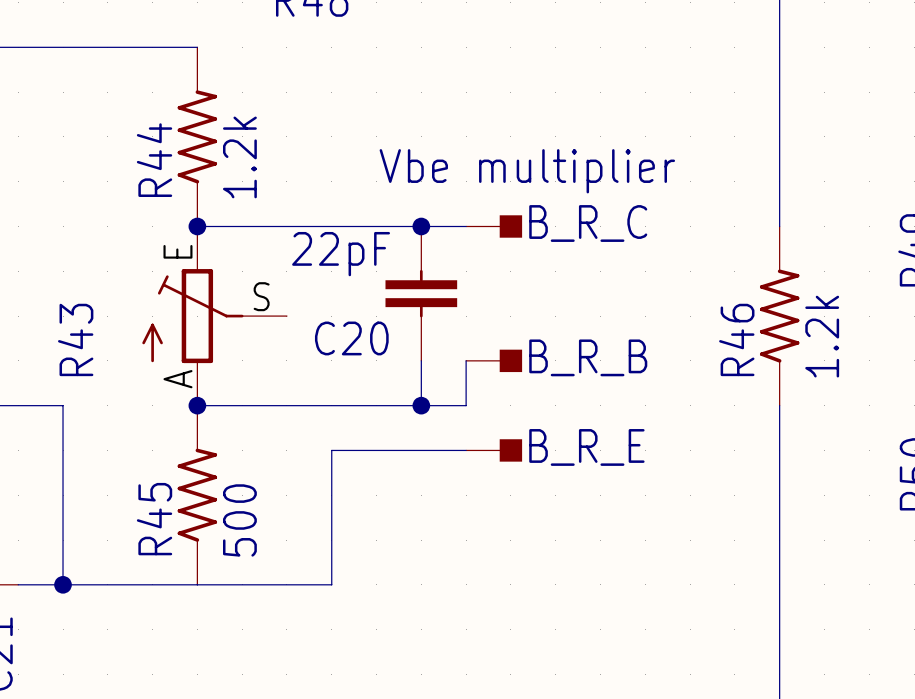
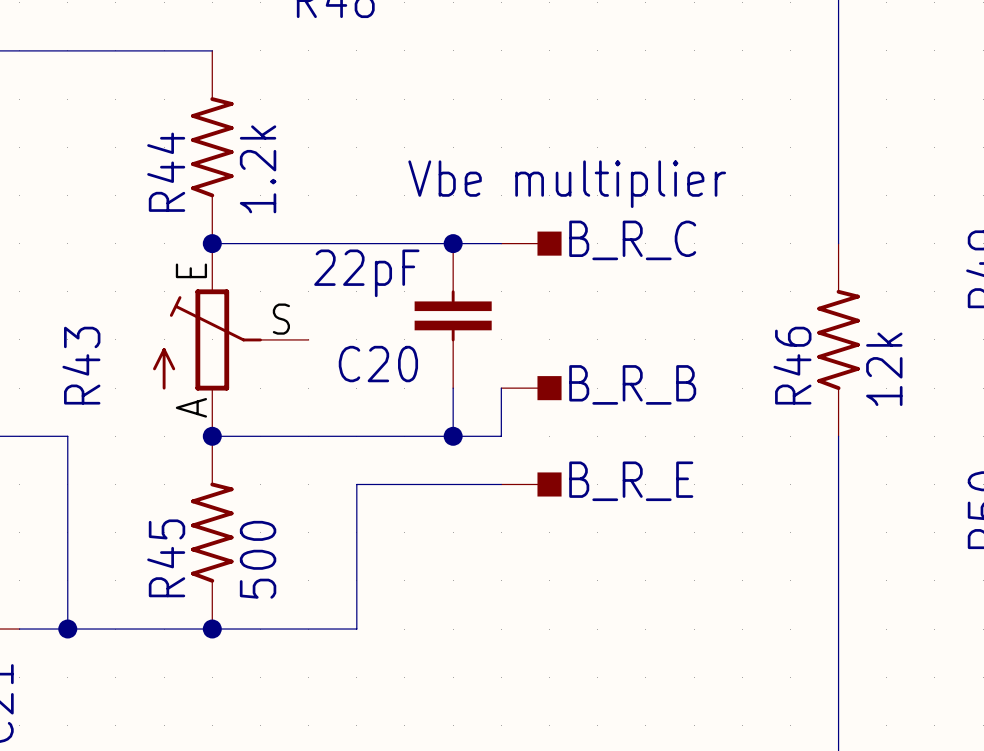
R46 value: 1.2k (822, 336) -> 12k (884, 369)
junction: none -> (212, 629)

